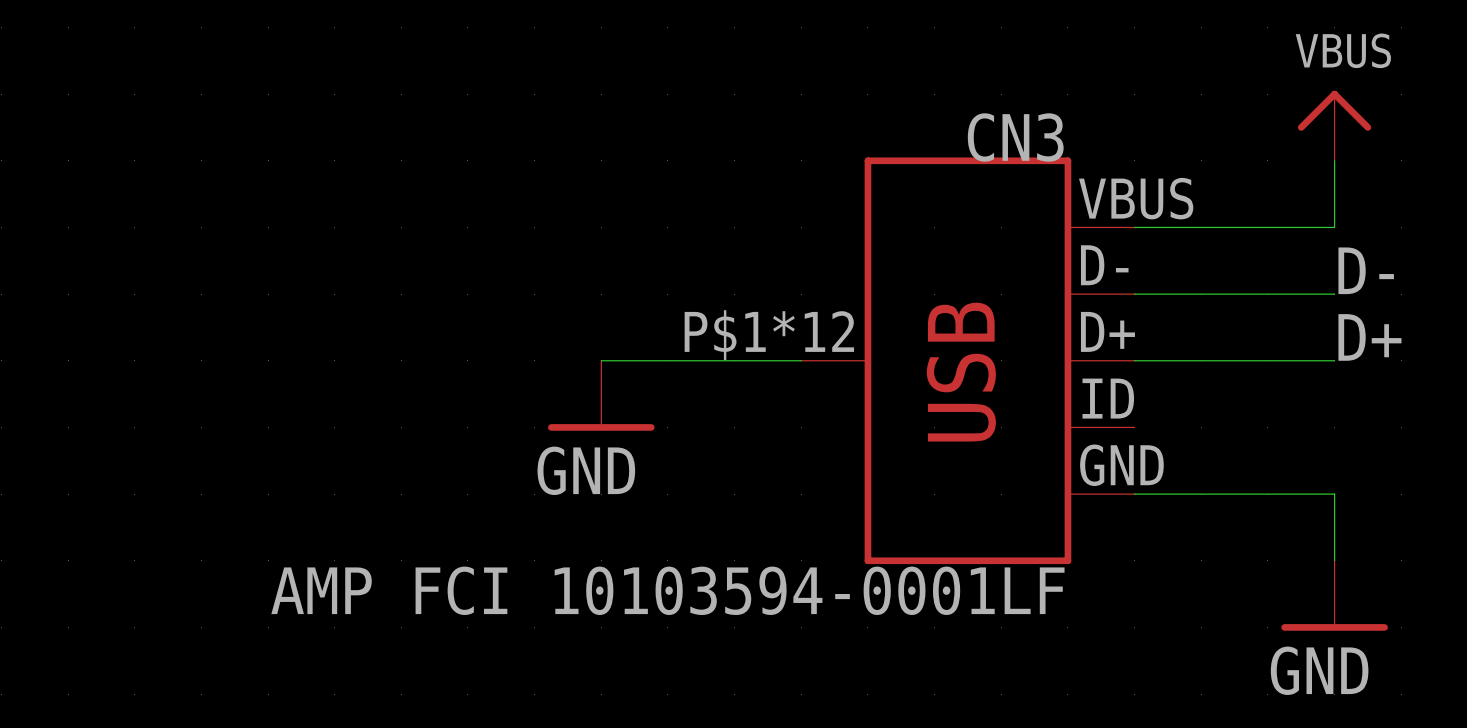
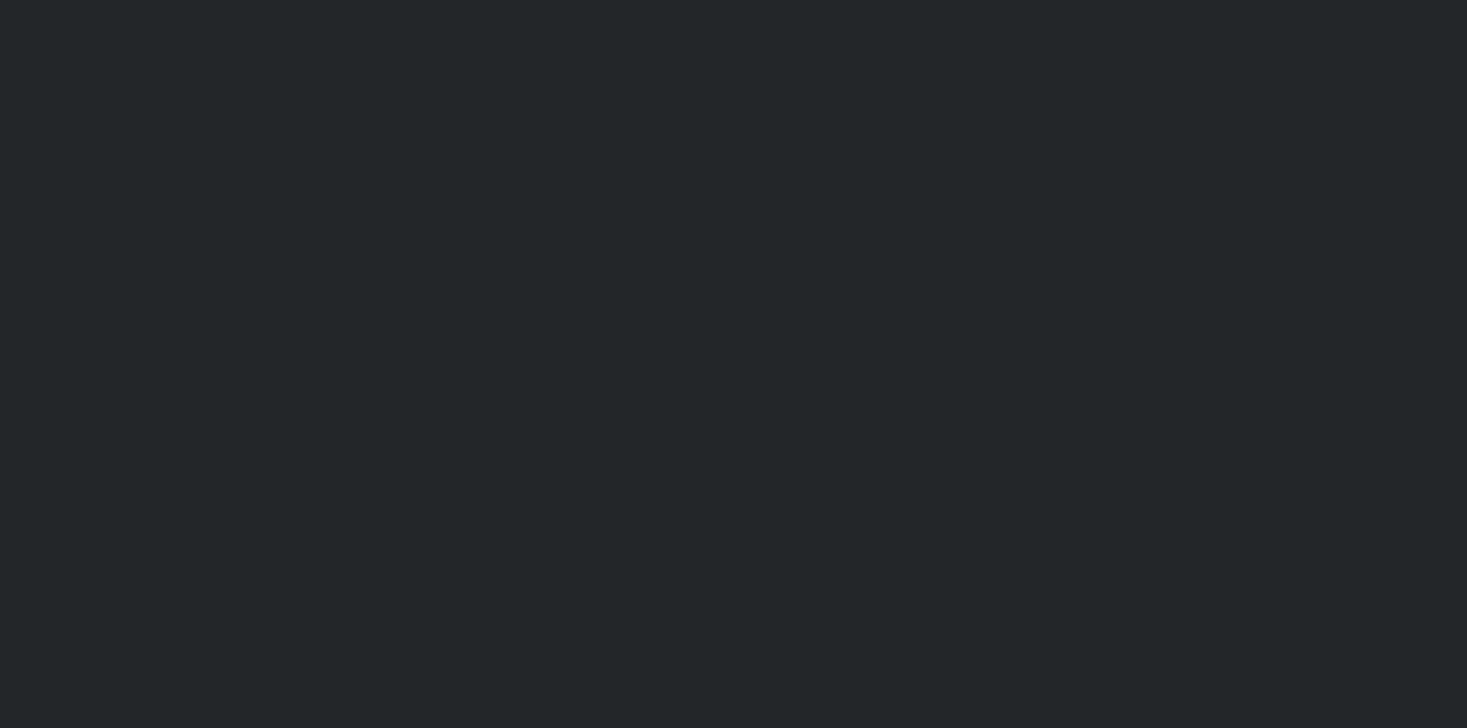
power symbol: VBUS (1334, 125) -> none
wire: (1334, 160) (1334, 227) (1134, 227) -> none
label: D- (1366, 270) -> none
wire: (1134, 294) (1334, 294) -> none
label: D+ (1369, 337) -> none
wire: (601, 360) (801, 360) -> none
CN3: AMP FCI 10103594-0001LF (967, 360) -> none
wire: (1134, 360) (1334, 360) -> none
power symbol: GND (601, 395) -> none
wire: (1134, 494) (1334, 494) (1334, 560) -> none
power symbol: GND (1334, 595) -> none

